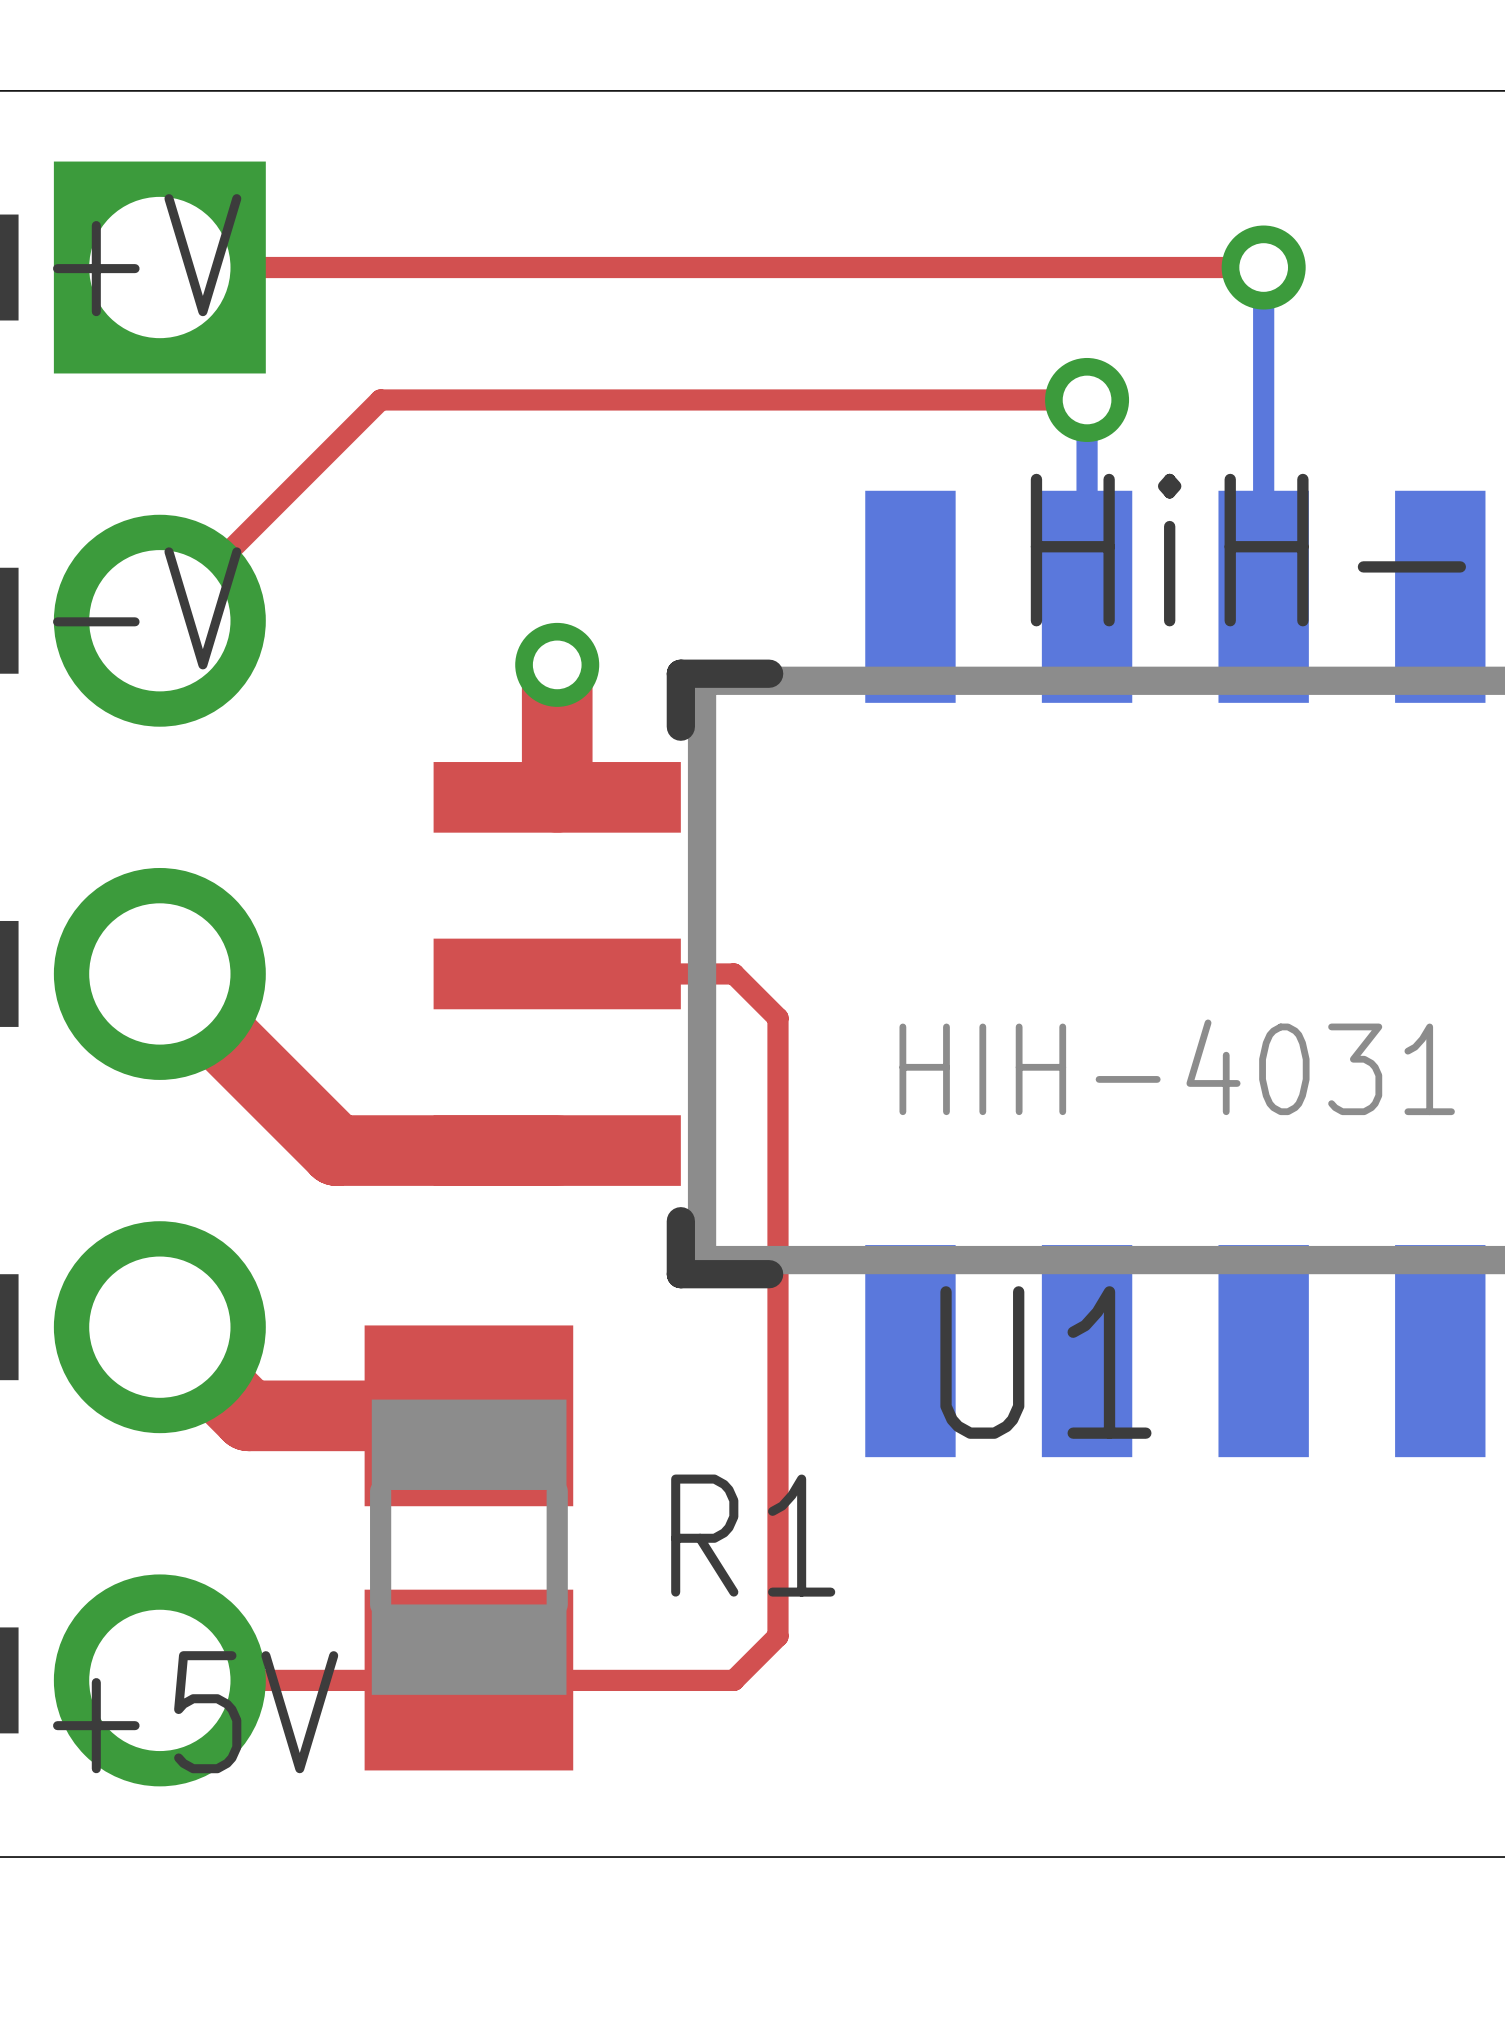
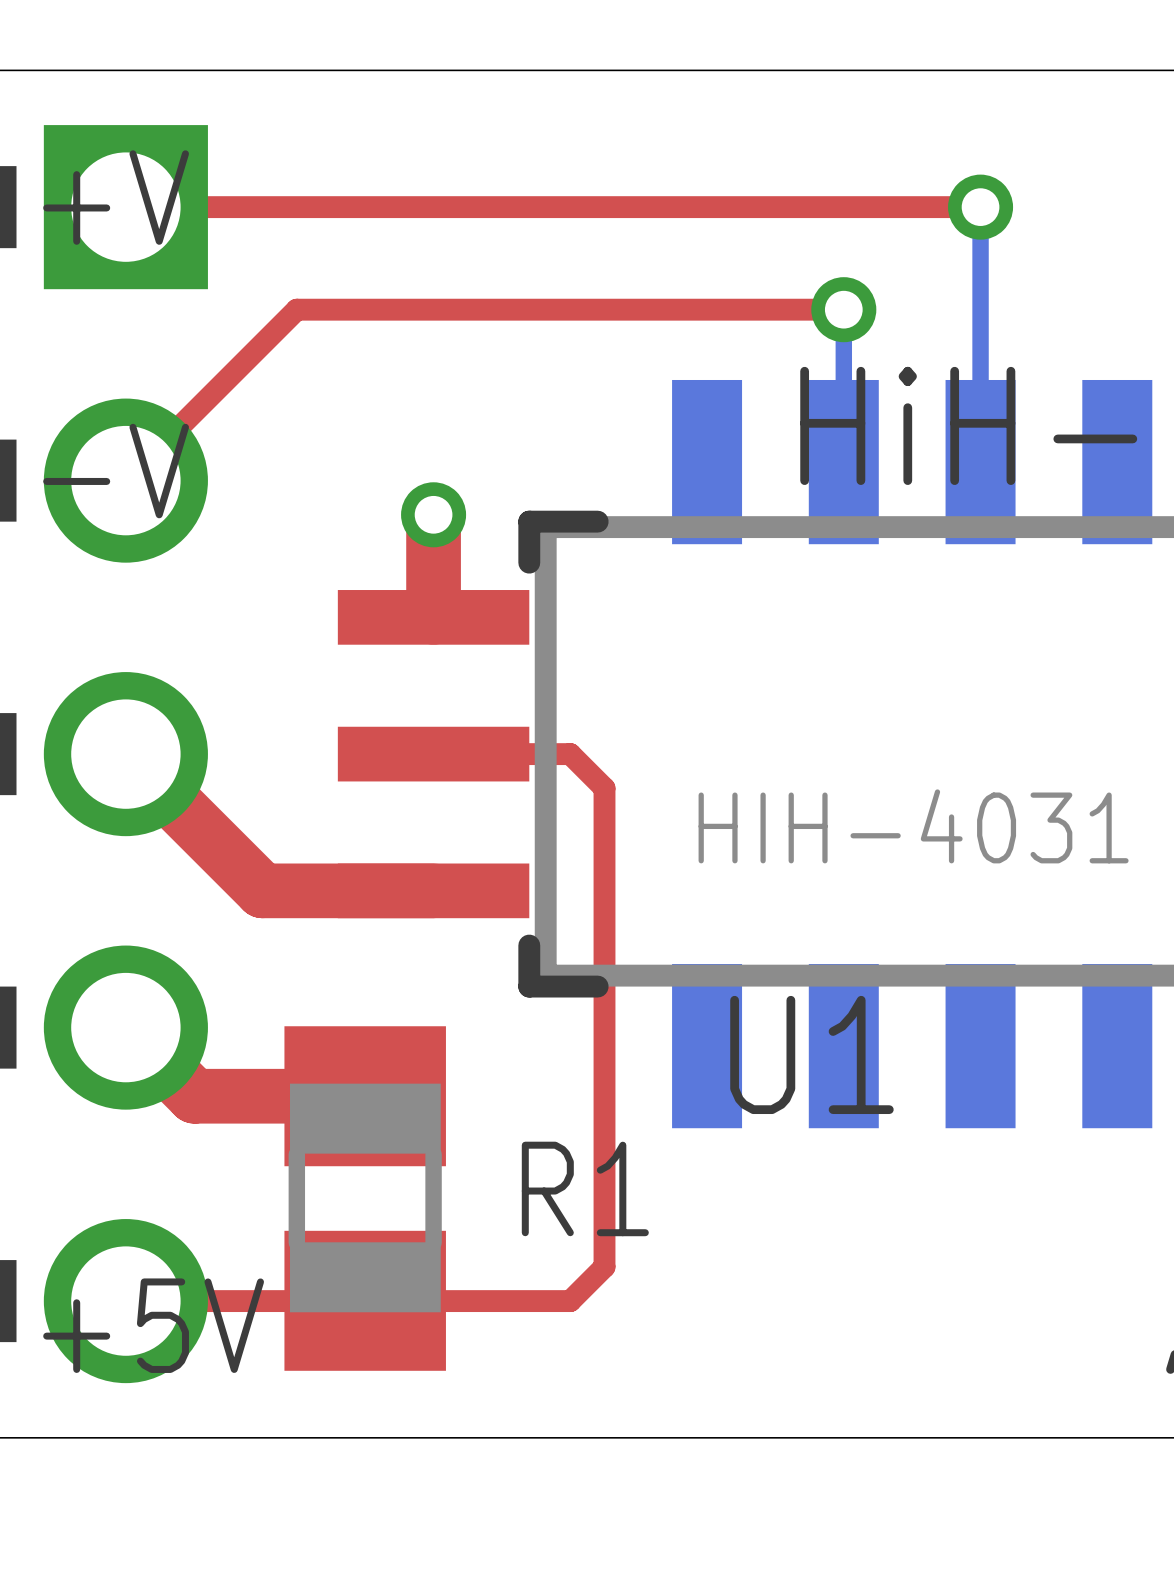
top track width: thin (159, 267) (1263, 267) -> thick (125, 207) (980, 207)
top track width: thin (1087, 399) (380, 399) (159, 620) -> thick (843, 309) (296, 309) (125, 480)
top track width: thin (557, 973) (733, 973) (777, 1018) (777, 1636) (733, 1680) (159, 1680) -> thick (433, 754) (570, 754) (604, 788) (604, 1266) (570, 1301) (125, 1301)

